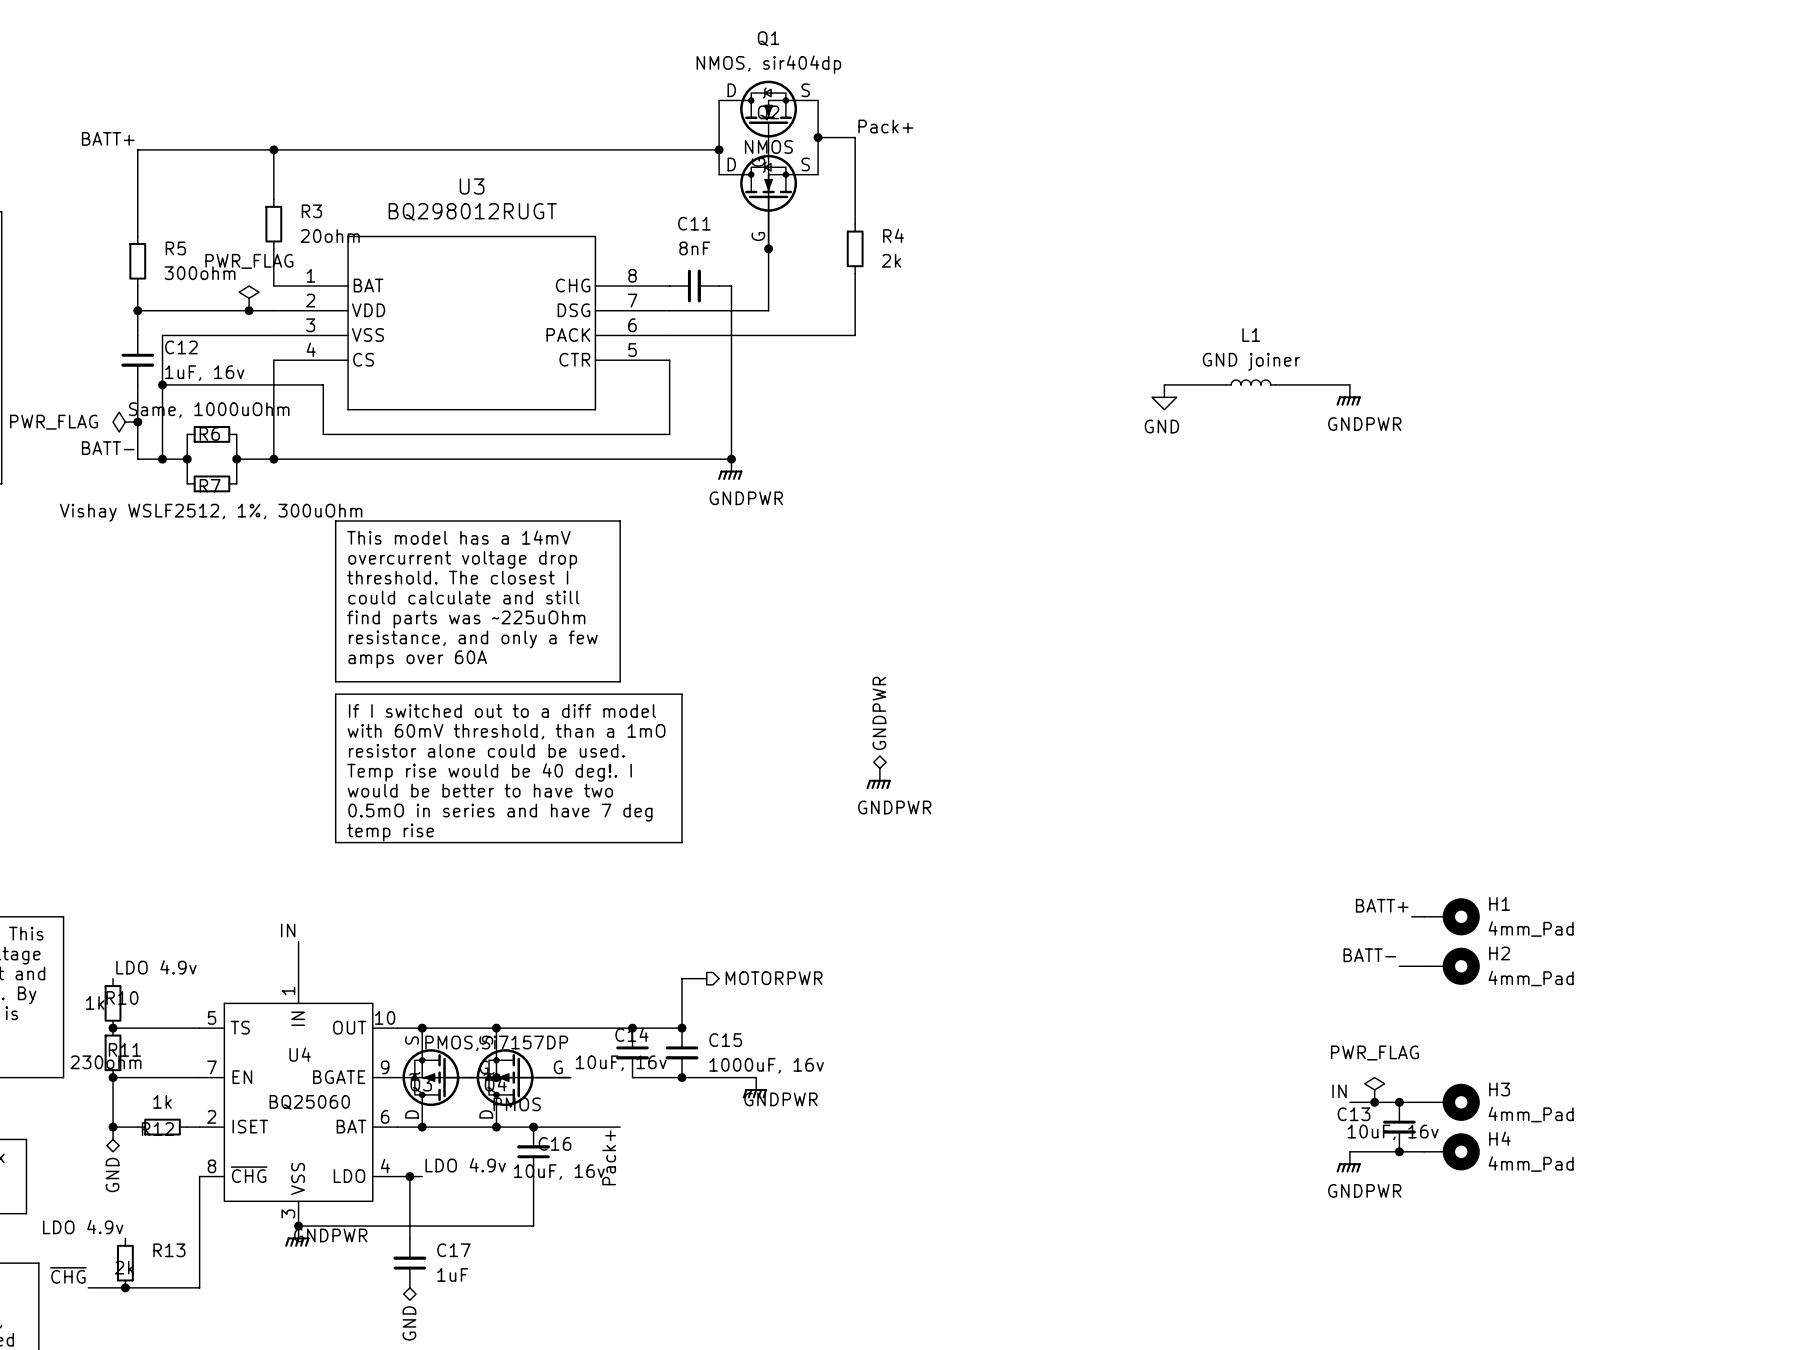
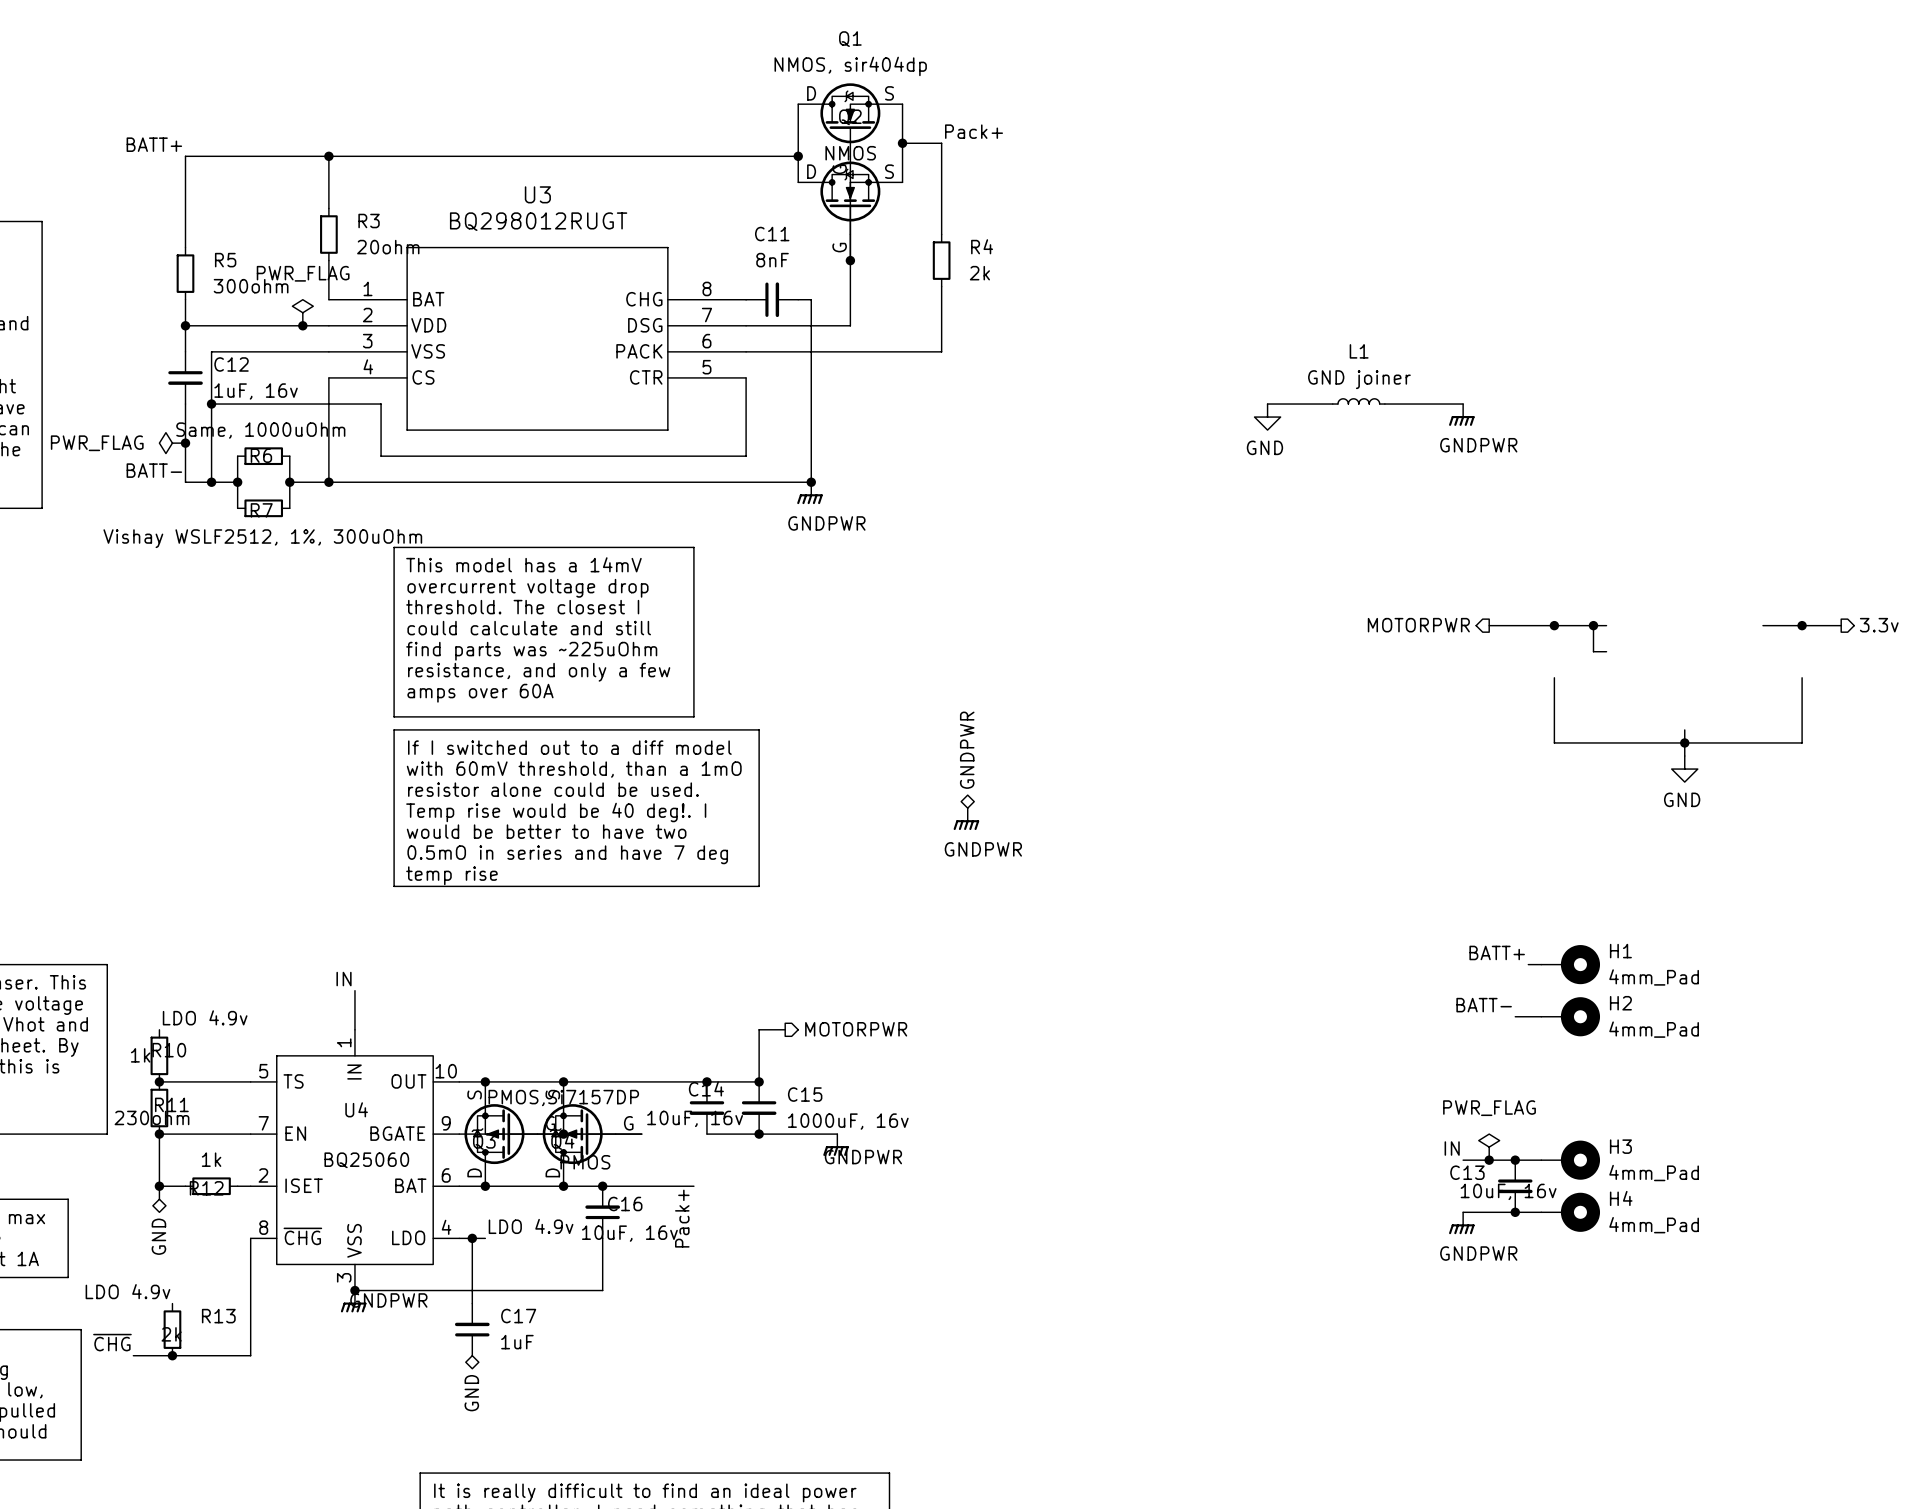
hierarchical label: none -> MOTORPWR (1418, 625)
hierarchical label: none -> 3.3v (1879, 625)
wire: none -> (1489, 625) (1606, 625)
junction: none -> (1554, 625)
wire: none -> (1593, 625) (1593, 651) (1606, 651)
junction: none -> (1593, 625)
wire: none -> (1762, 625) (1841, 625)
junction: none -> (1802, 625)
wire: none -> (1554, 677) (1554, 742) (1802, 742) (1802, 677)
wire: none -> (1684, 729) (1684, 756)
junction: none -> (1684, 742)
power symbol: none -> GND (1684, 769)

